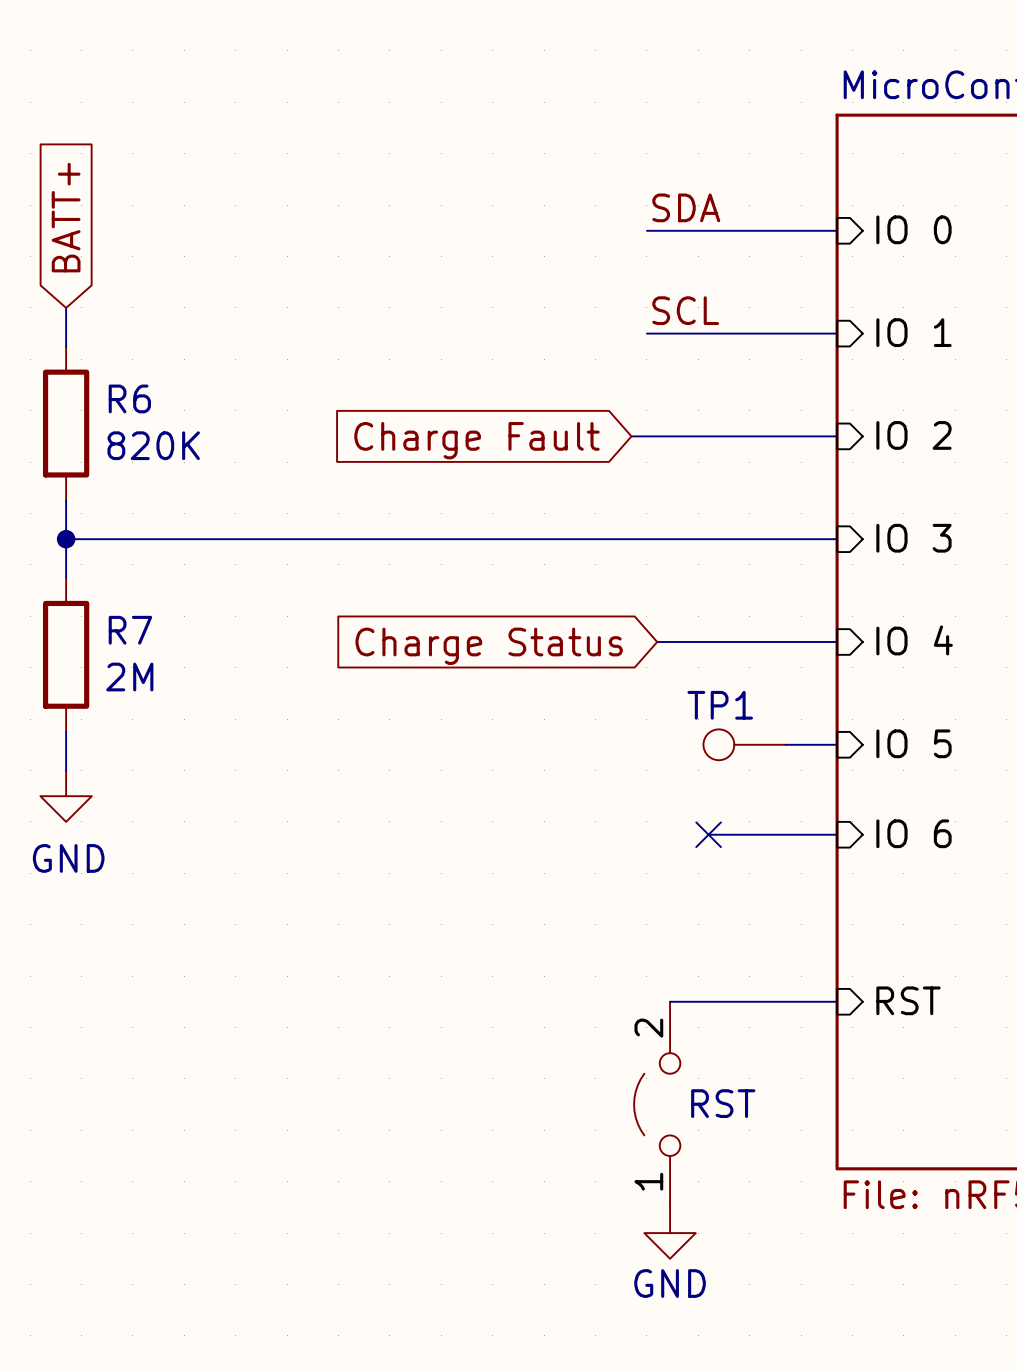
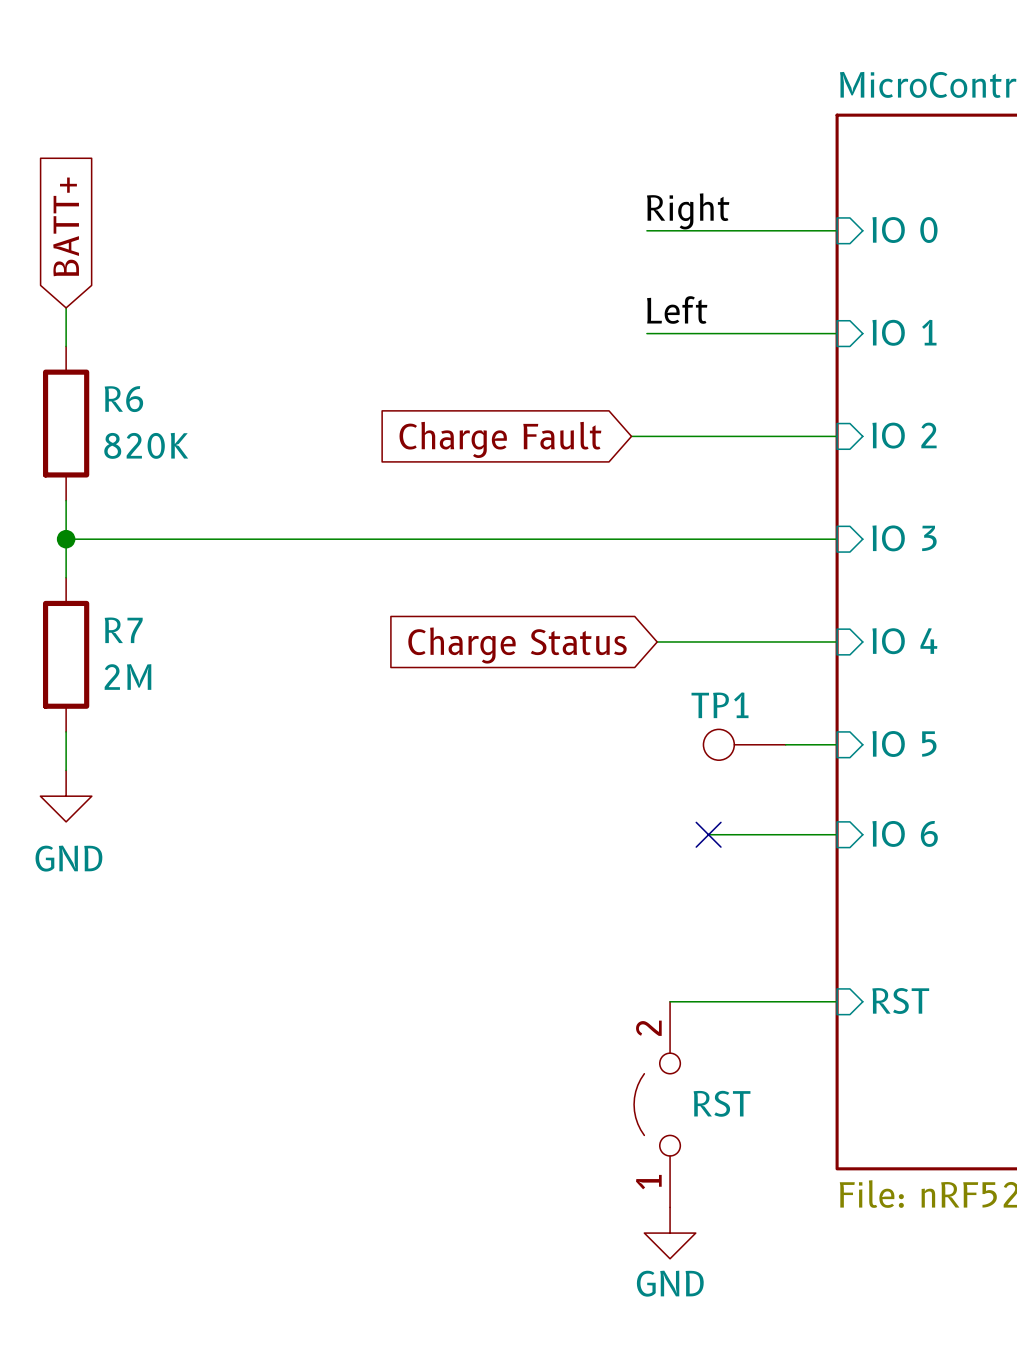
label: SDA (686, 207) -> Right (688, 211)
label: SCL (685, 310) -> Left (677, 309)

